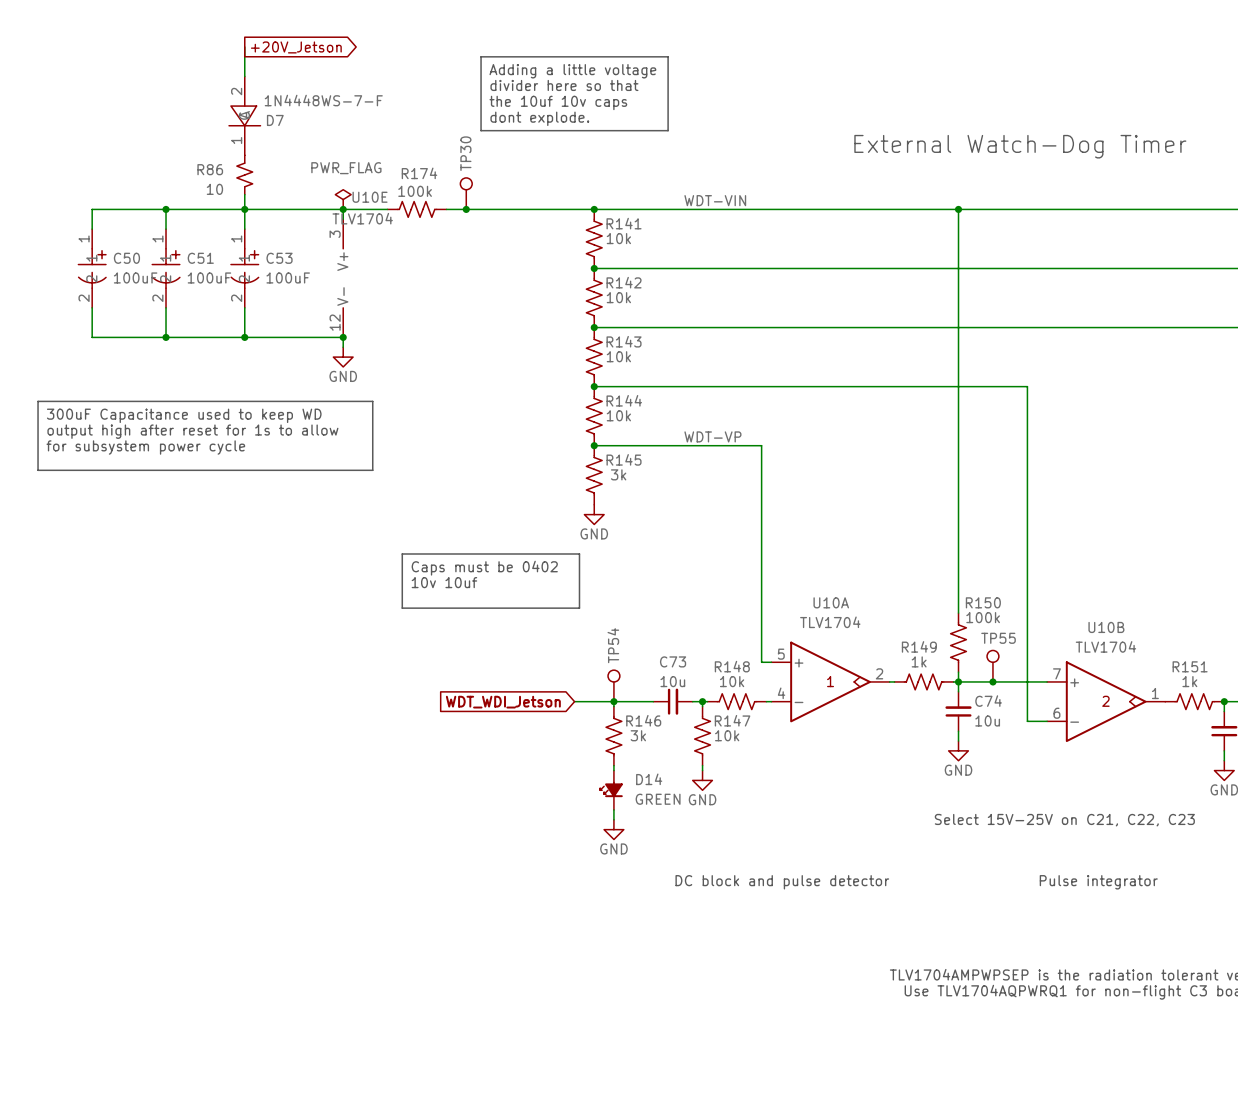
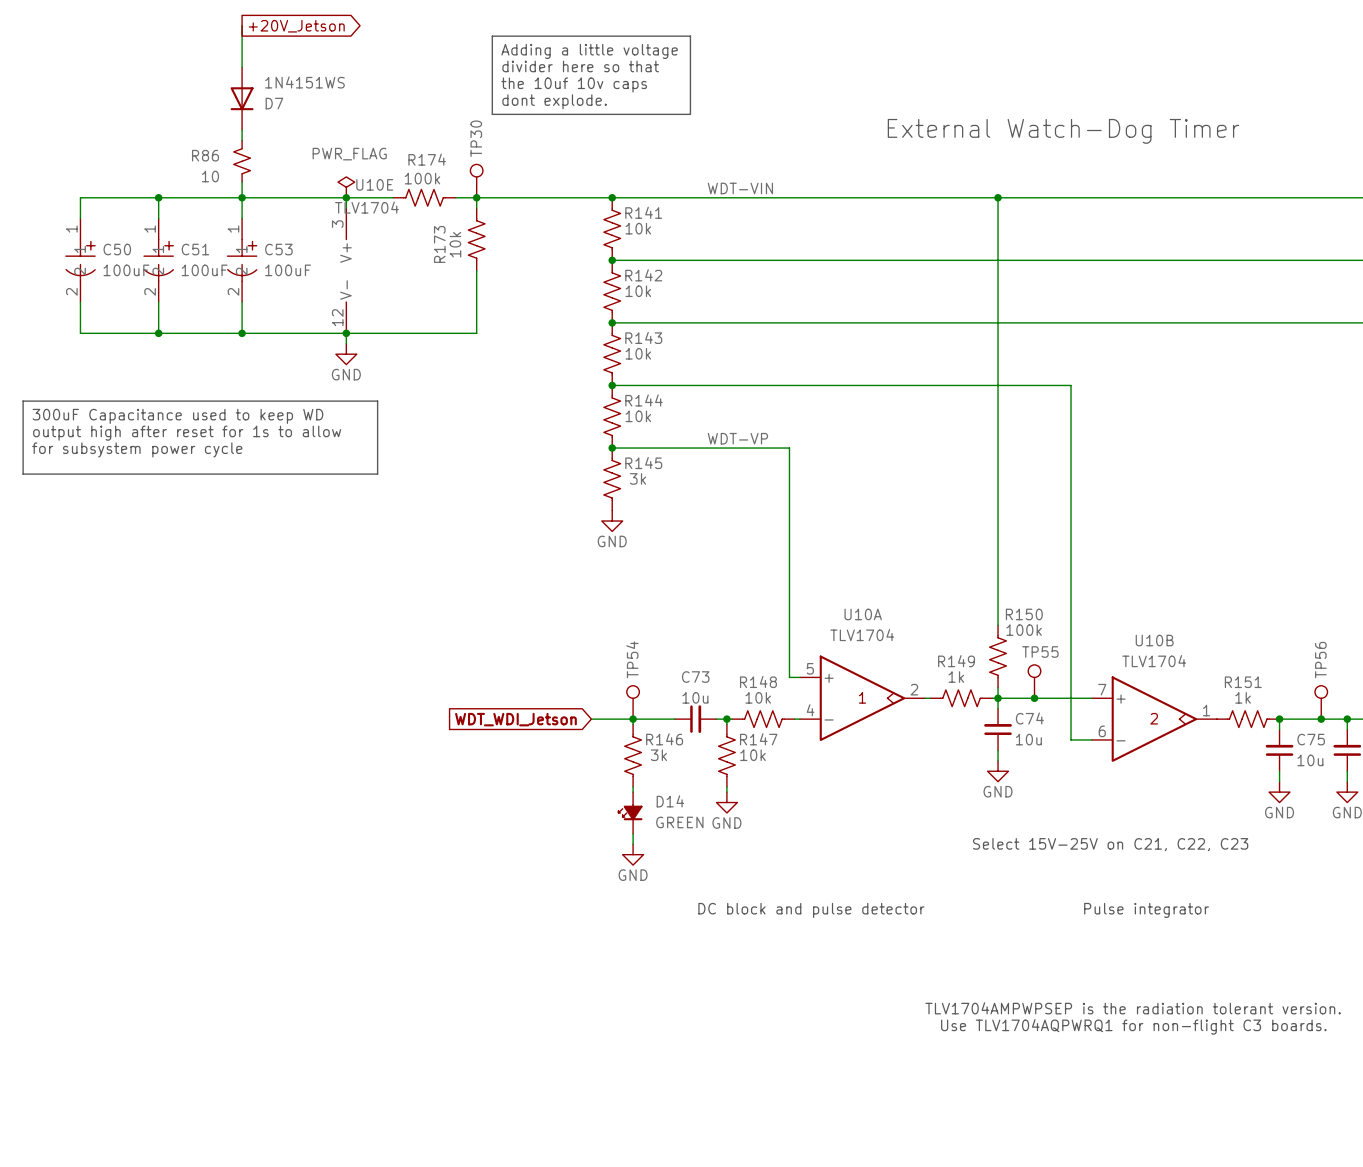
D7 symbol: [229, 76, 261, 156] -> [230, 67, 254, 131]
D7 value: 1N4448WS-7-F (323, 100) -> 1N4151WS (304, 82)
wire: none -> (476, 197) (476, 208)
R173: none -> 10k (476, 239)
wire: none -> (476, 270) (476, 333) (346, 333)
line: (402, 553) (579, 553) (579, 608) (402, 608) (402, 553) -> none
text: Caps must be 0402 (484, 568) -> none
text: 10v 10uf (444, 582) -> none

